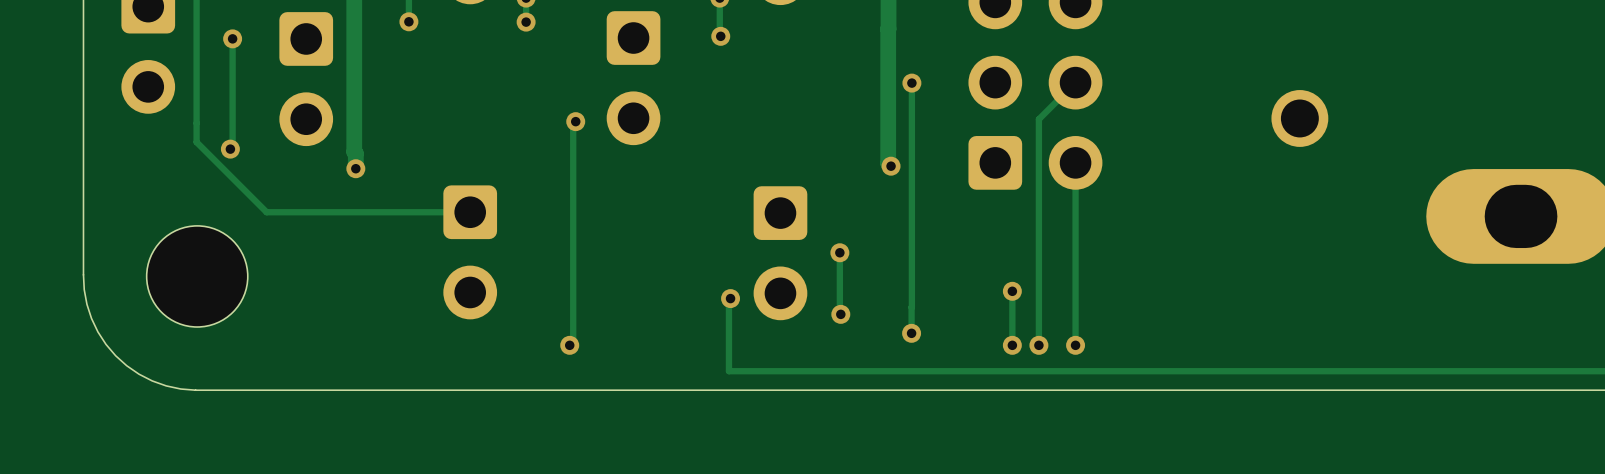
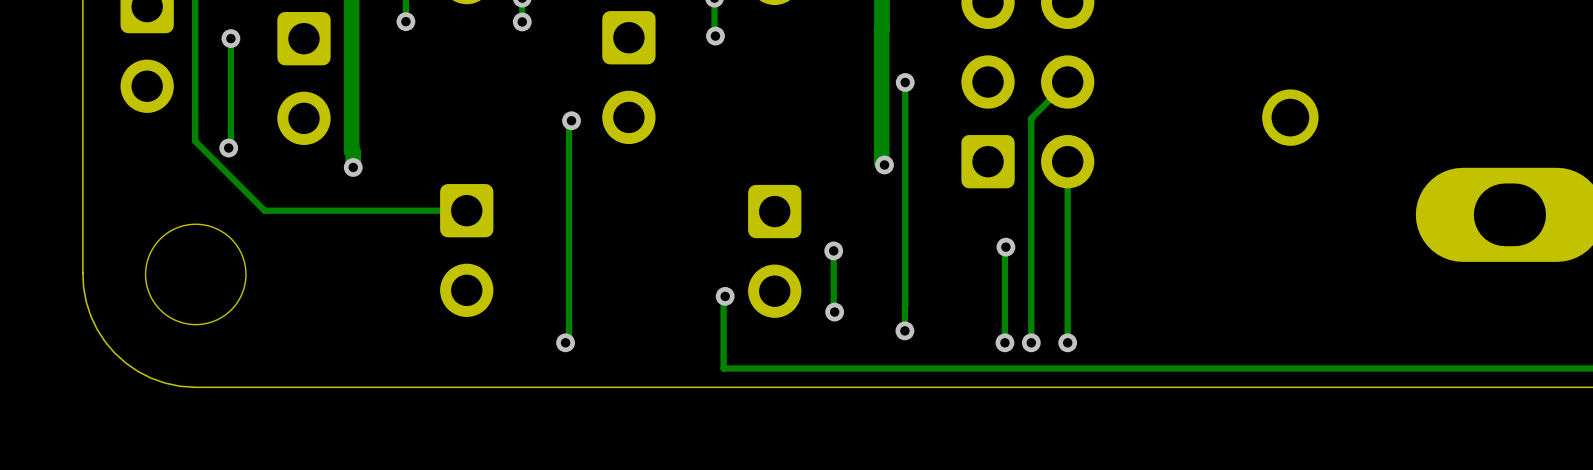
track: none -> (1005, 247) (1004, 289)
via position: (1012, 291) -> (1005, 247)

